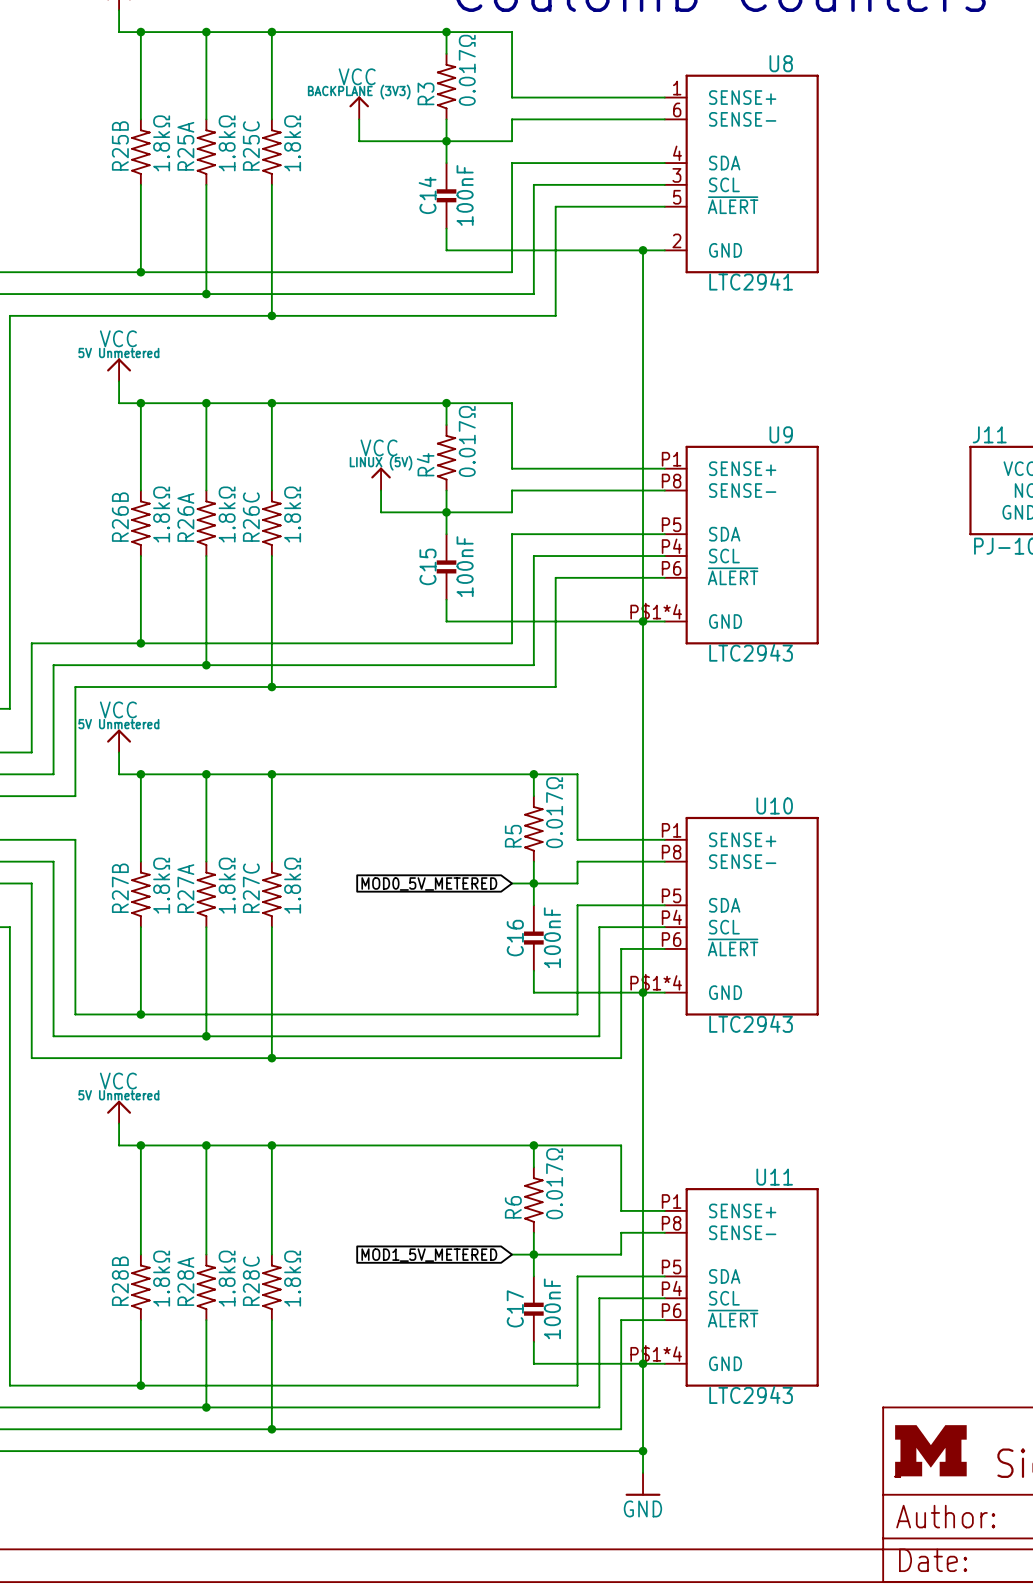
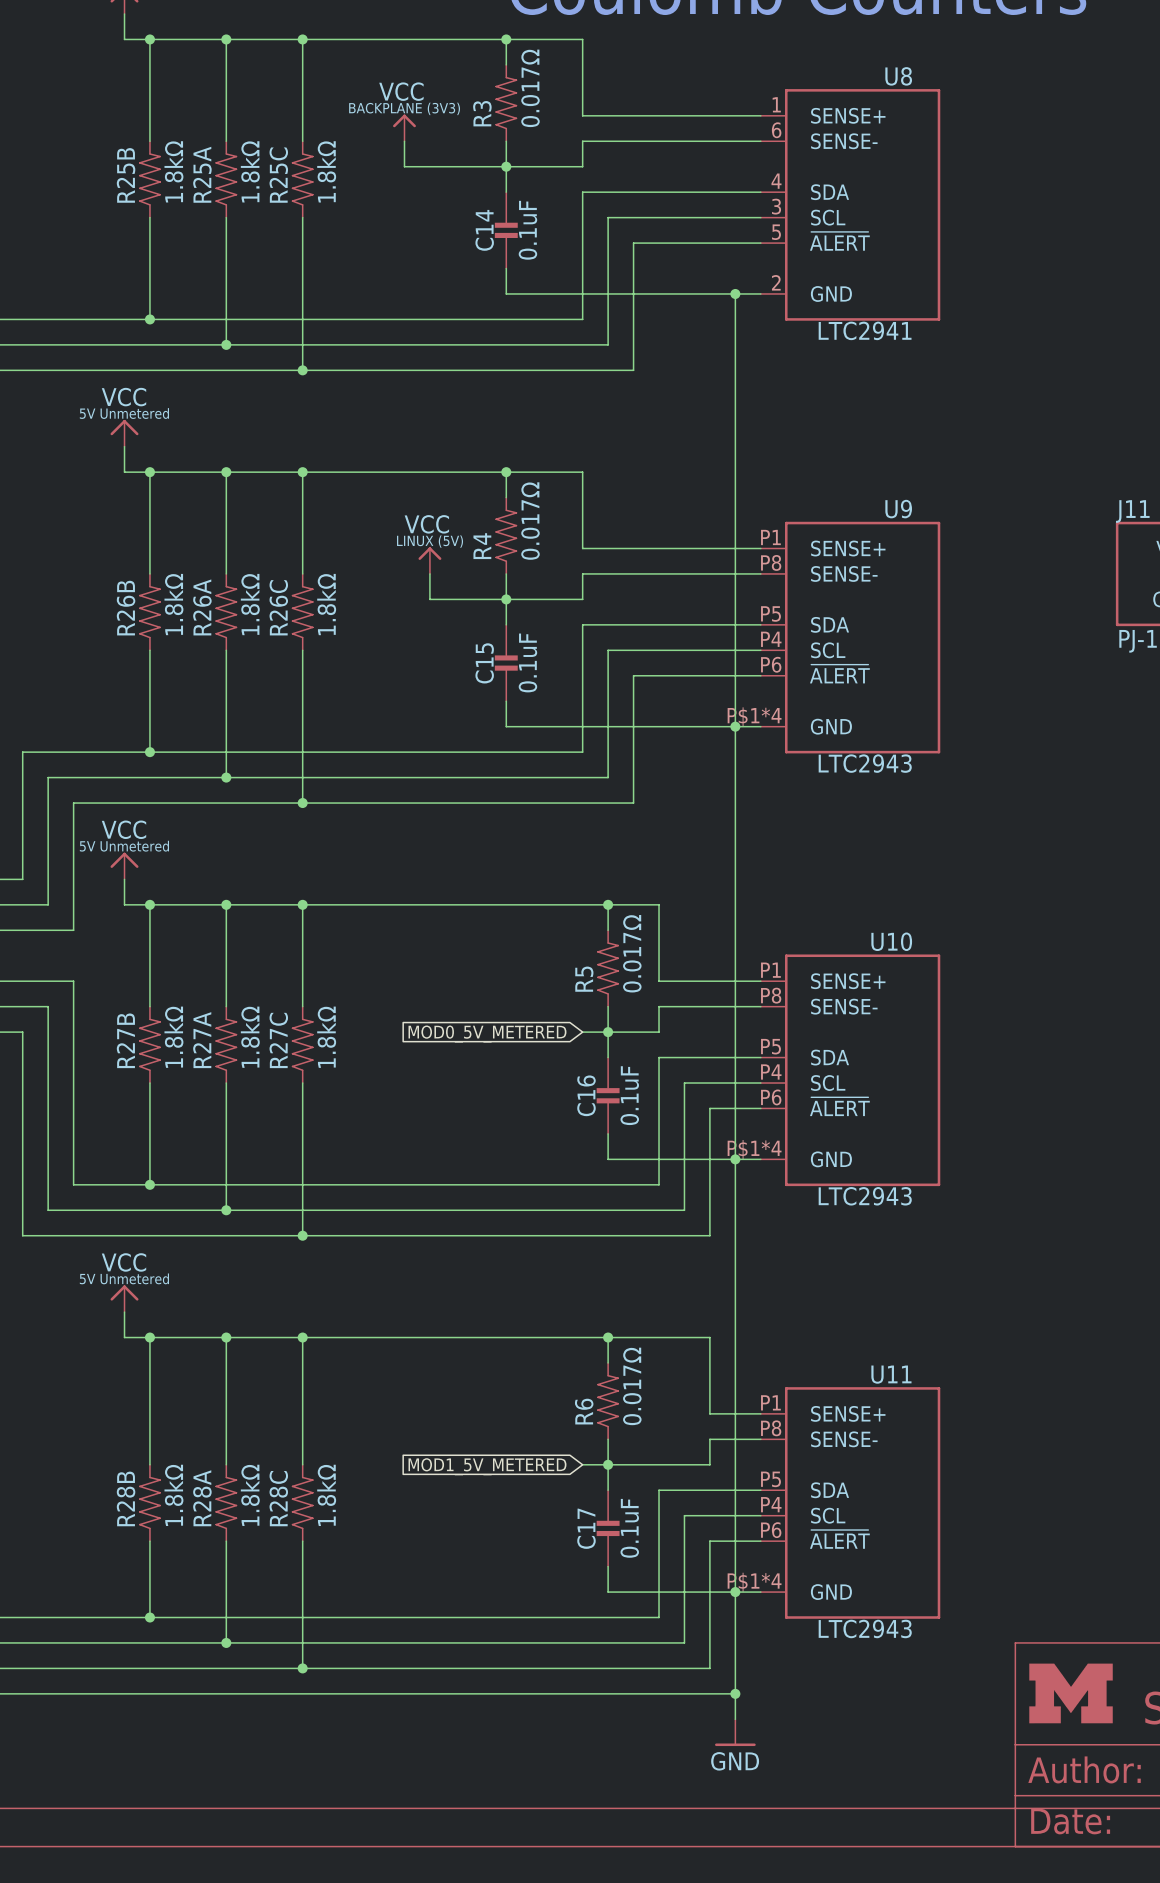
C14 value: 100nF (465, 195) -> 0.1uF (527, 230)
C15 value: 100nF (465, 566) -> 0.1uF (527, 662)
C16 value: 100nF (552, 937) -> 0.1uF (629, 1095)
C17 value: 100nF (552, 1308) -> 0.1uF (629, 1528)

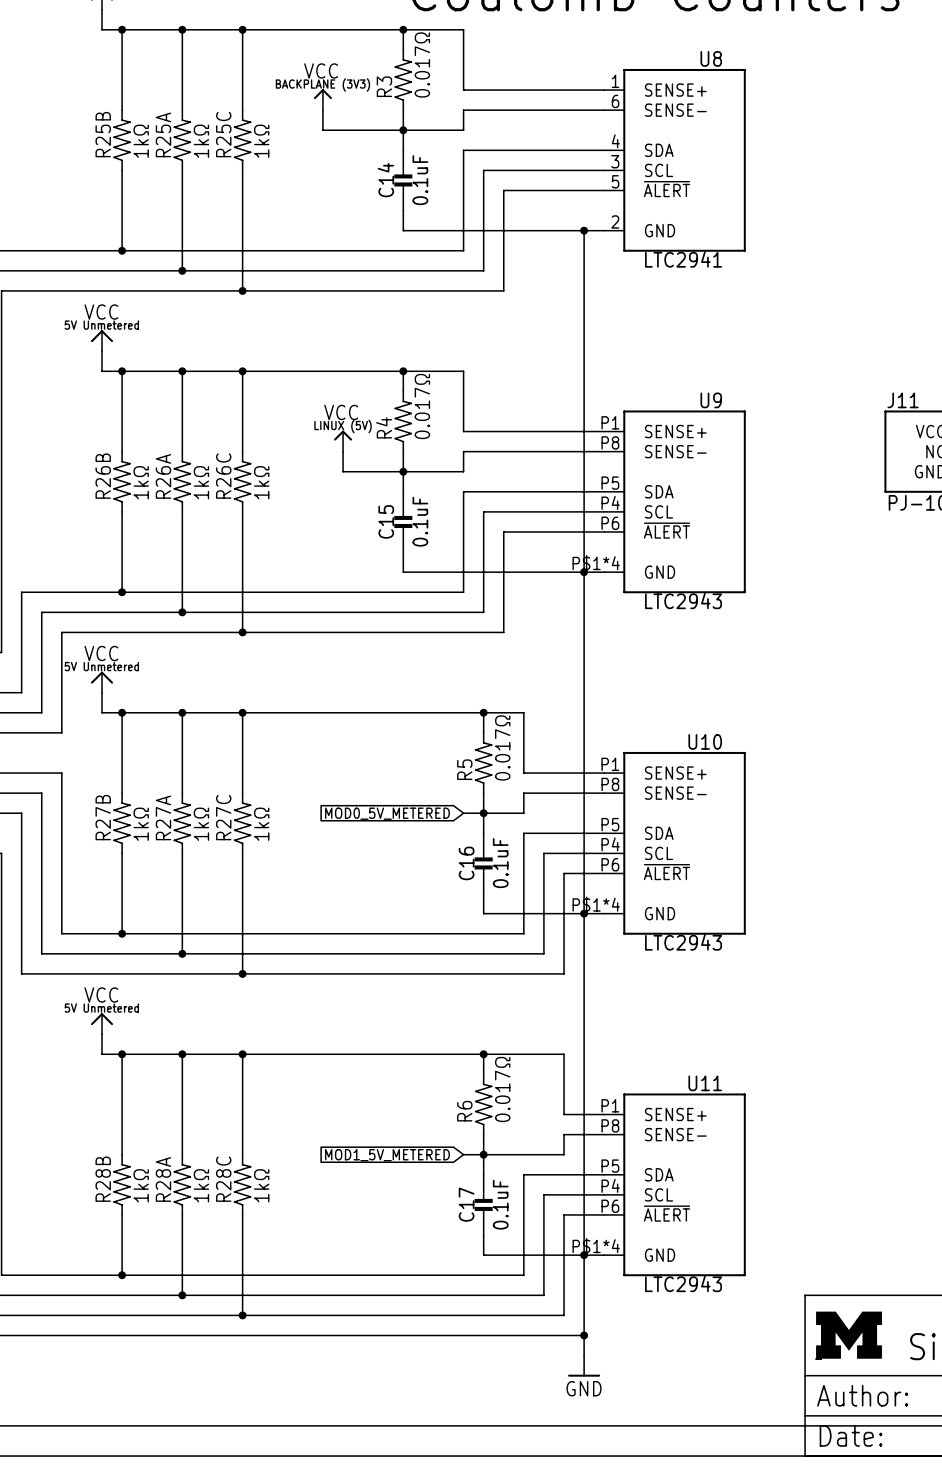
R25B value: 1.8kΩ (173, 171) -> 1kΩ (141, 141)
R25A value: 1.8kΩ (250, 171) -> 1kΩ (201, 141)
R25C value: 1.8kΩ (326, 171) -> 1kΩ (261, 141)
R26B value: 1.8kΩ (173, 604) -> 1kΩ (141, 482)
R26A value: 1.8kΩ (250, 604) -> 1kΩ (201, 482)
R26C value: 1.8kΩ (326, 604) -> 1kΩ (261, 482)
R27B value: 1.8kΩ (173, 1037) -> 1kΩ (141, 824)
R27A value: 1.8kΩ (250, 1037) -> 1kΩ (201, 824)
R27C value: 1.8kΩ (326, 1037) -> 1kΩ (261, 824)
R28B value: 1.8kΩ (173, 1495) -> 1kΩ (141, 1185)
R28A value: 1.8kΩ (250, 1495) -> 1kΩ (201, 1185)
R28C value: 1.8kΩ (326, 1495) -> 1kΩ (261, 1185)

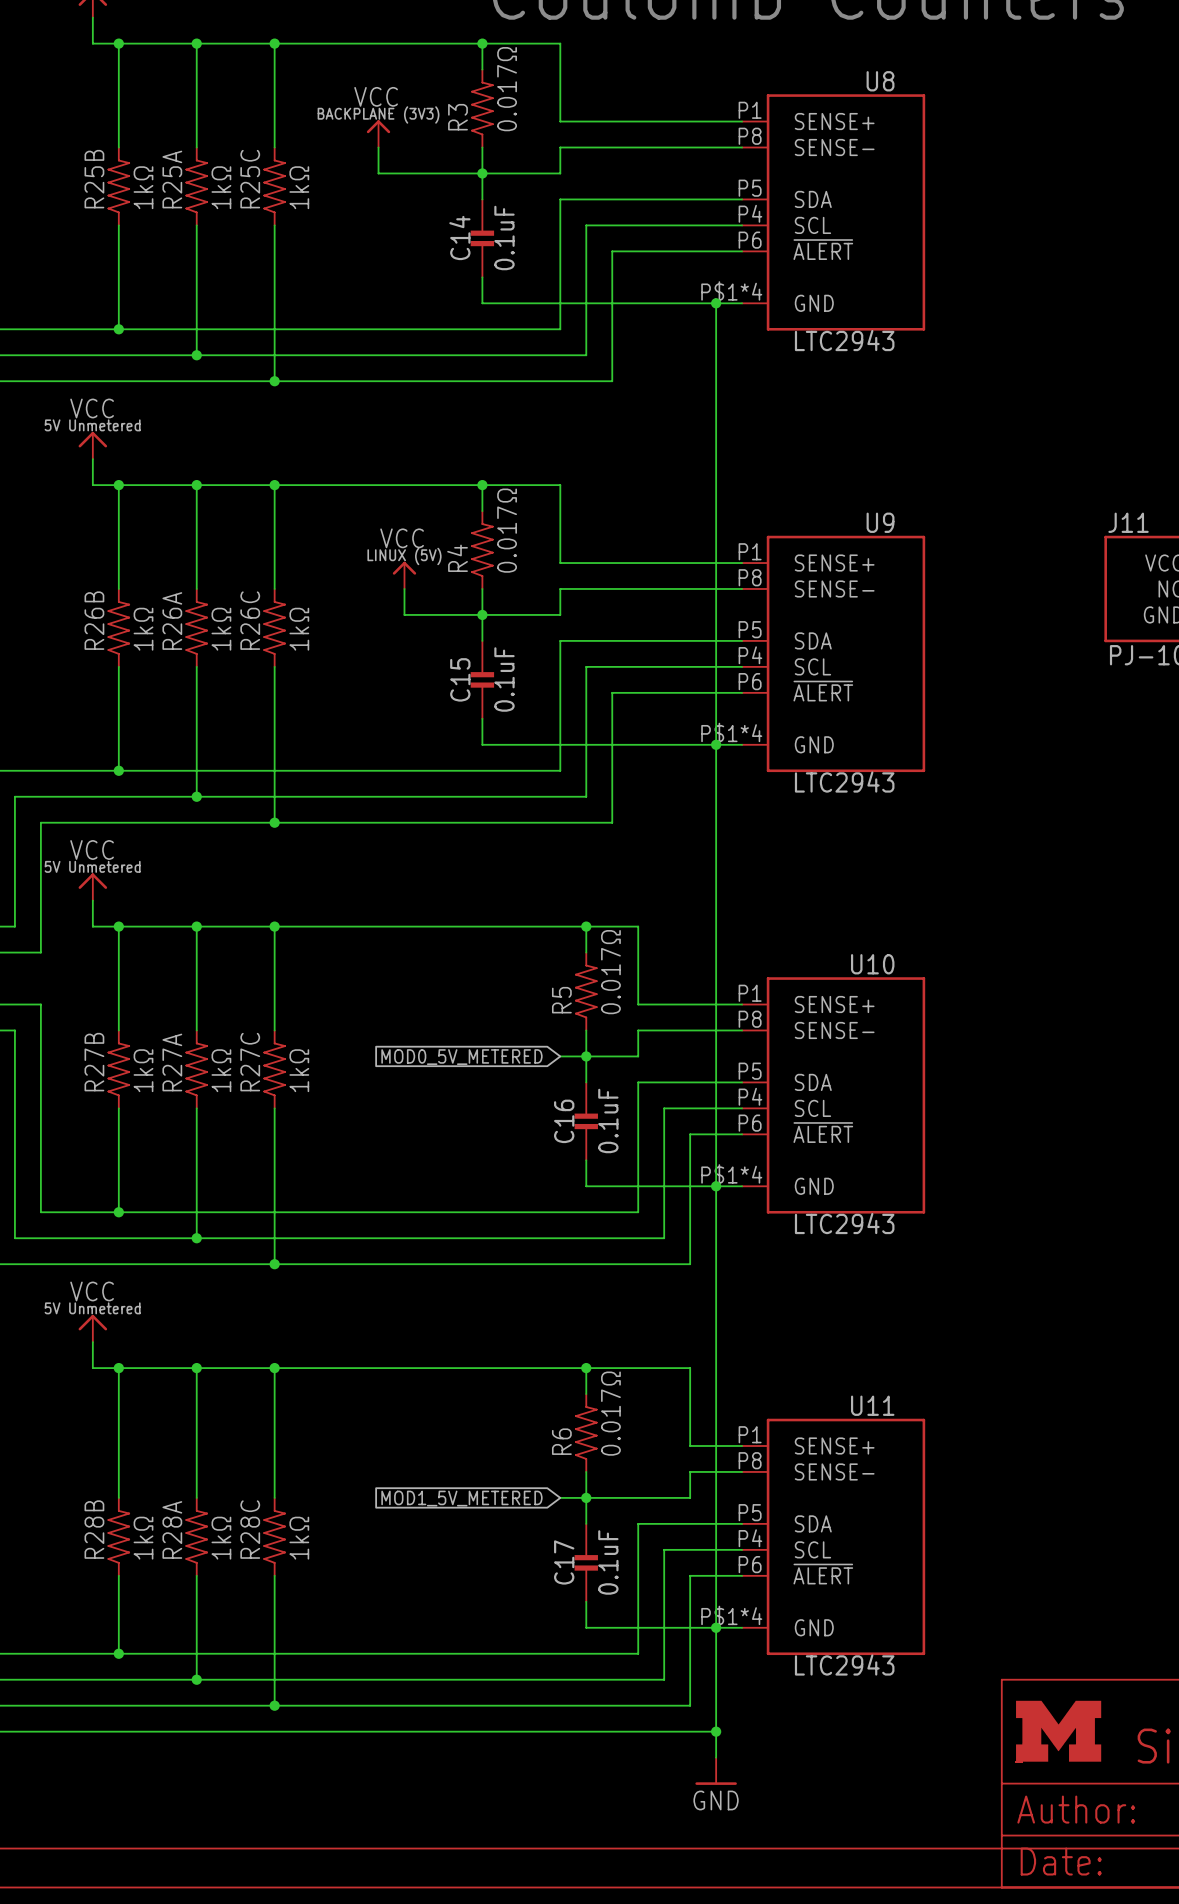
U8 pin number: 1 (615, 81) -> P1 (750, 110)
U8 pin number: 6 (615, 101) -> P8 (750, 136)
U8 pin number: 4 (615, 141) -> P5 (750, 188)
U8 pin number: 3 (615, 161) -> P4 (750, 213)
U8 pin number: 5 (615, 181) -> P6 (750, 240)
U8 pin number: 2 (615, 221) -> P$1*4 (731, 292)
U8 value: LTC2941 (683, 259) -> LTC2943 (844, 340)

